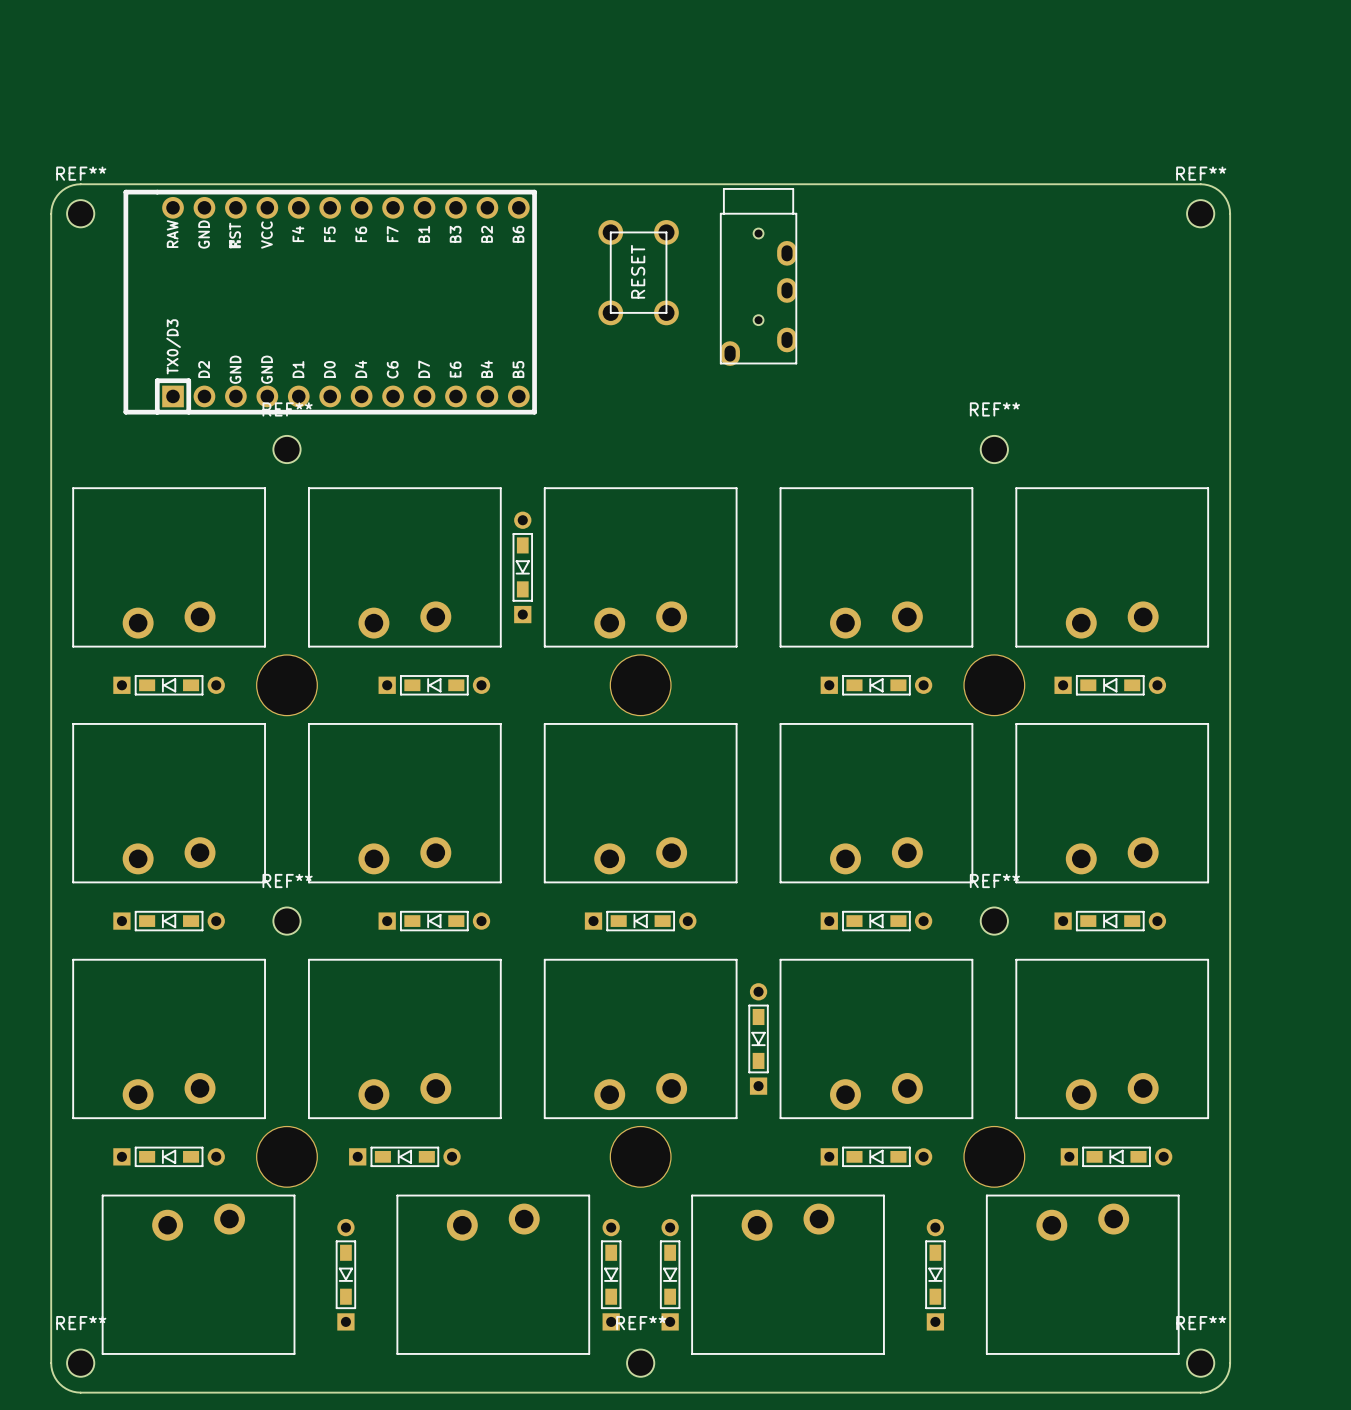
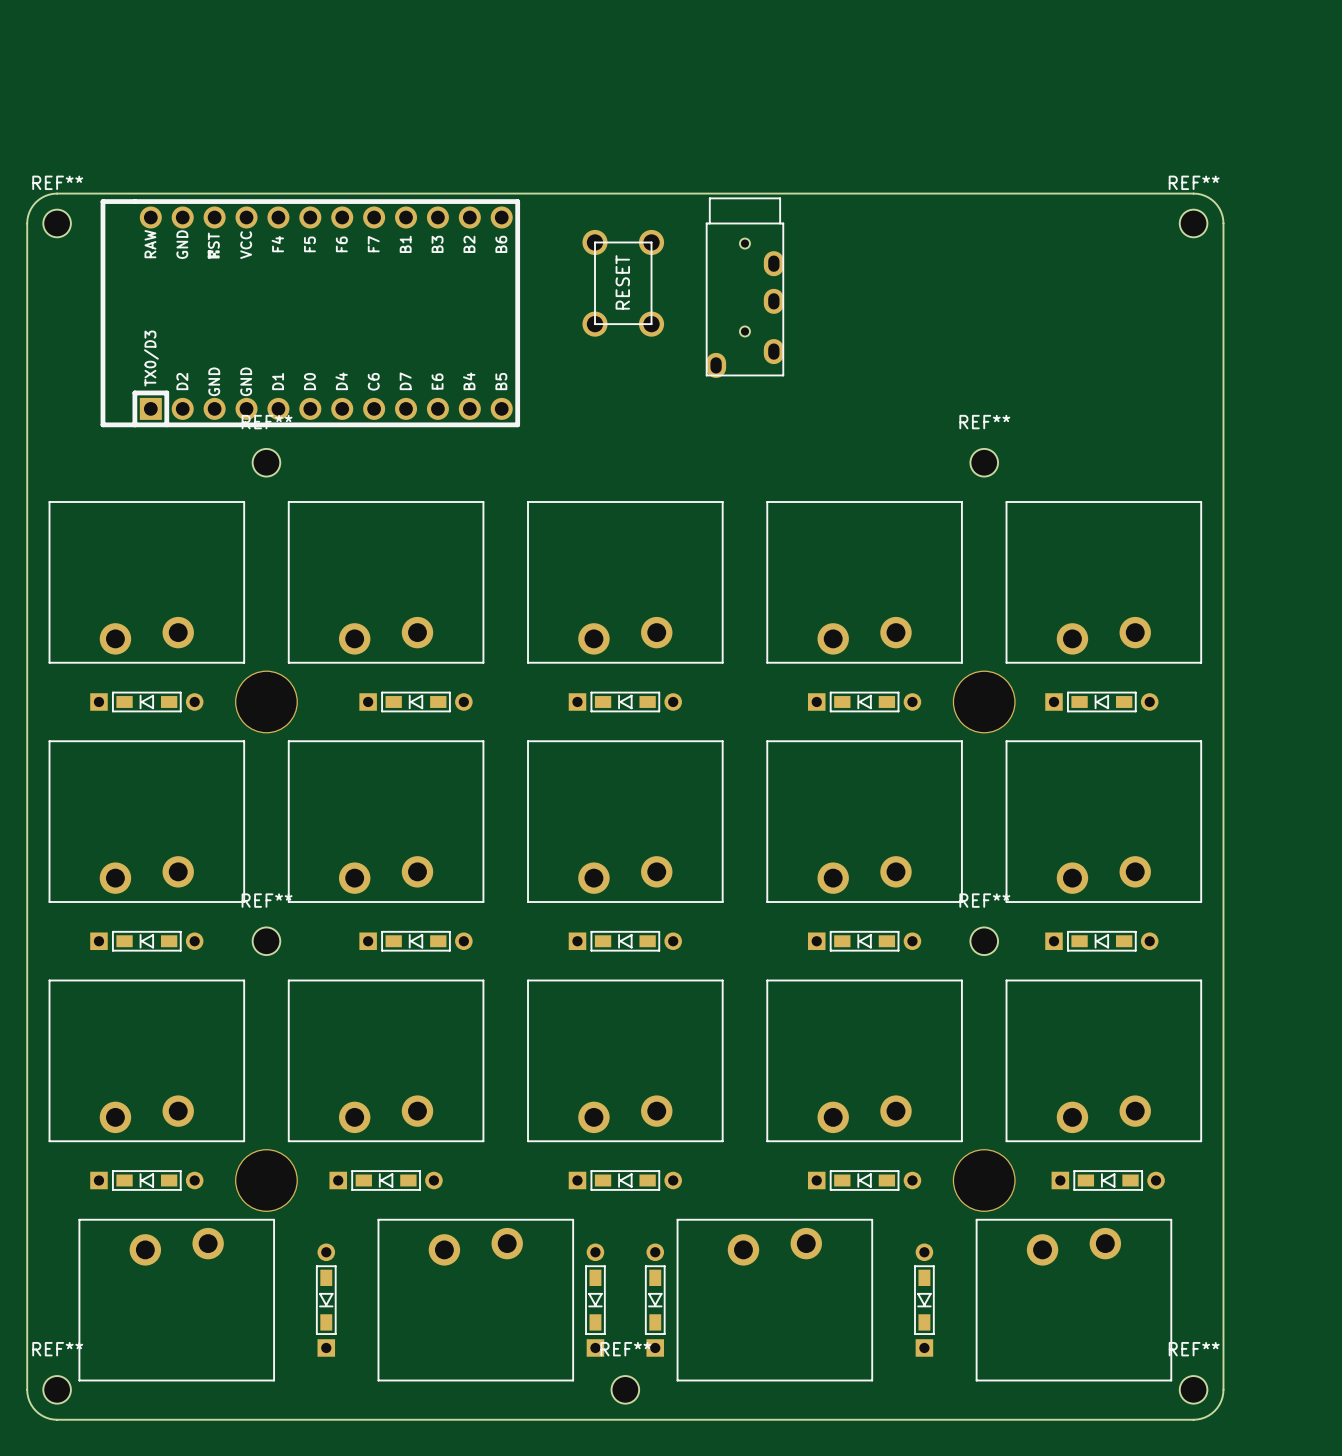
part: (522, 567) -> none
part footprint: [609, 654, 672, 717] -> [568, 691, 682, 713]
part: (758, 1038) -> none
part footprint: [609, 1125, 672, 1188] -> [568, 1170, 682, 1191]

